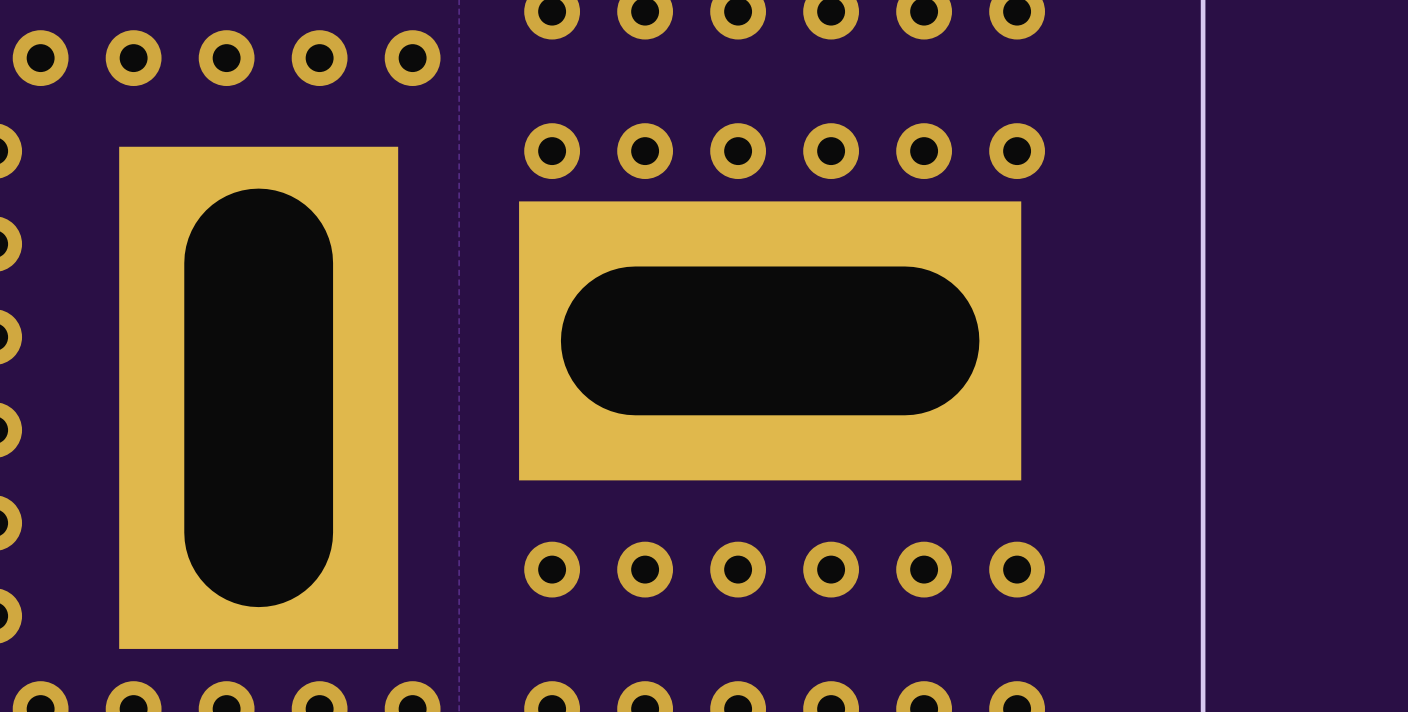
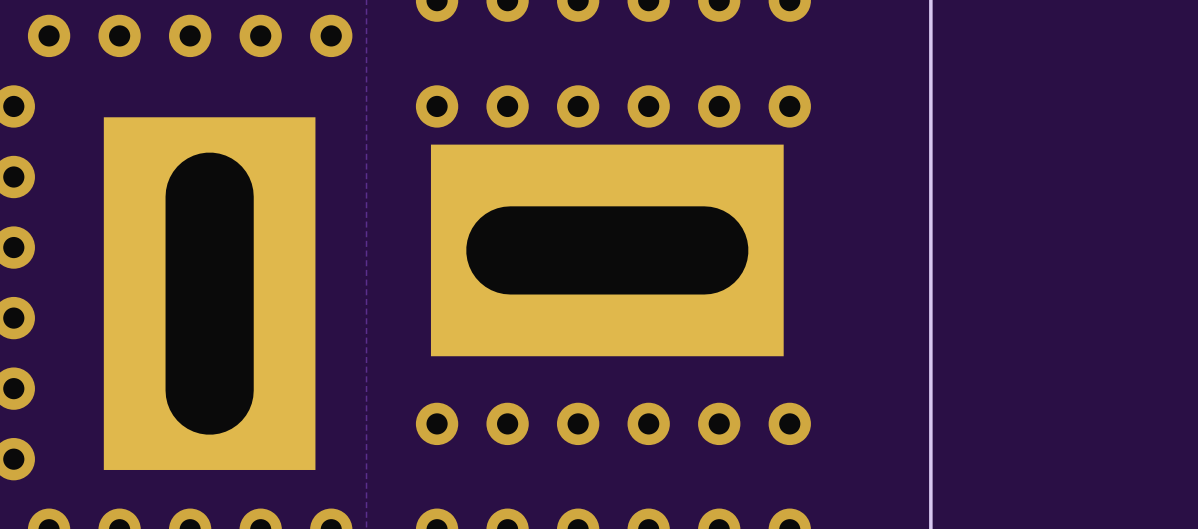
part footprint: [119, 146, 1022, 649] -> [103, 117, 784, 470]

